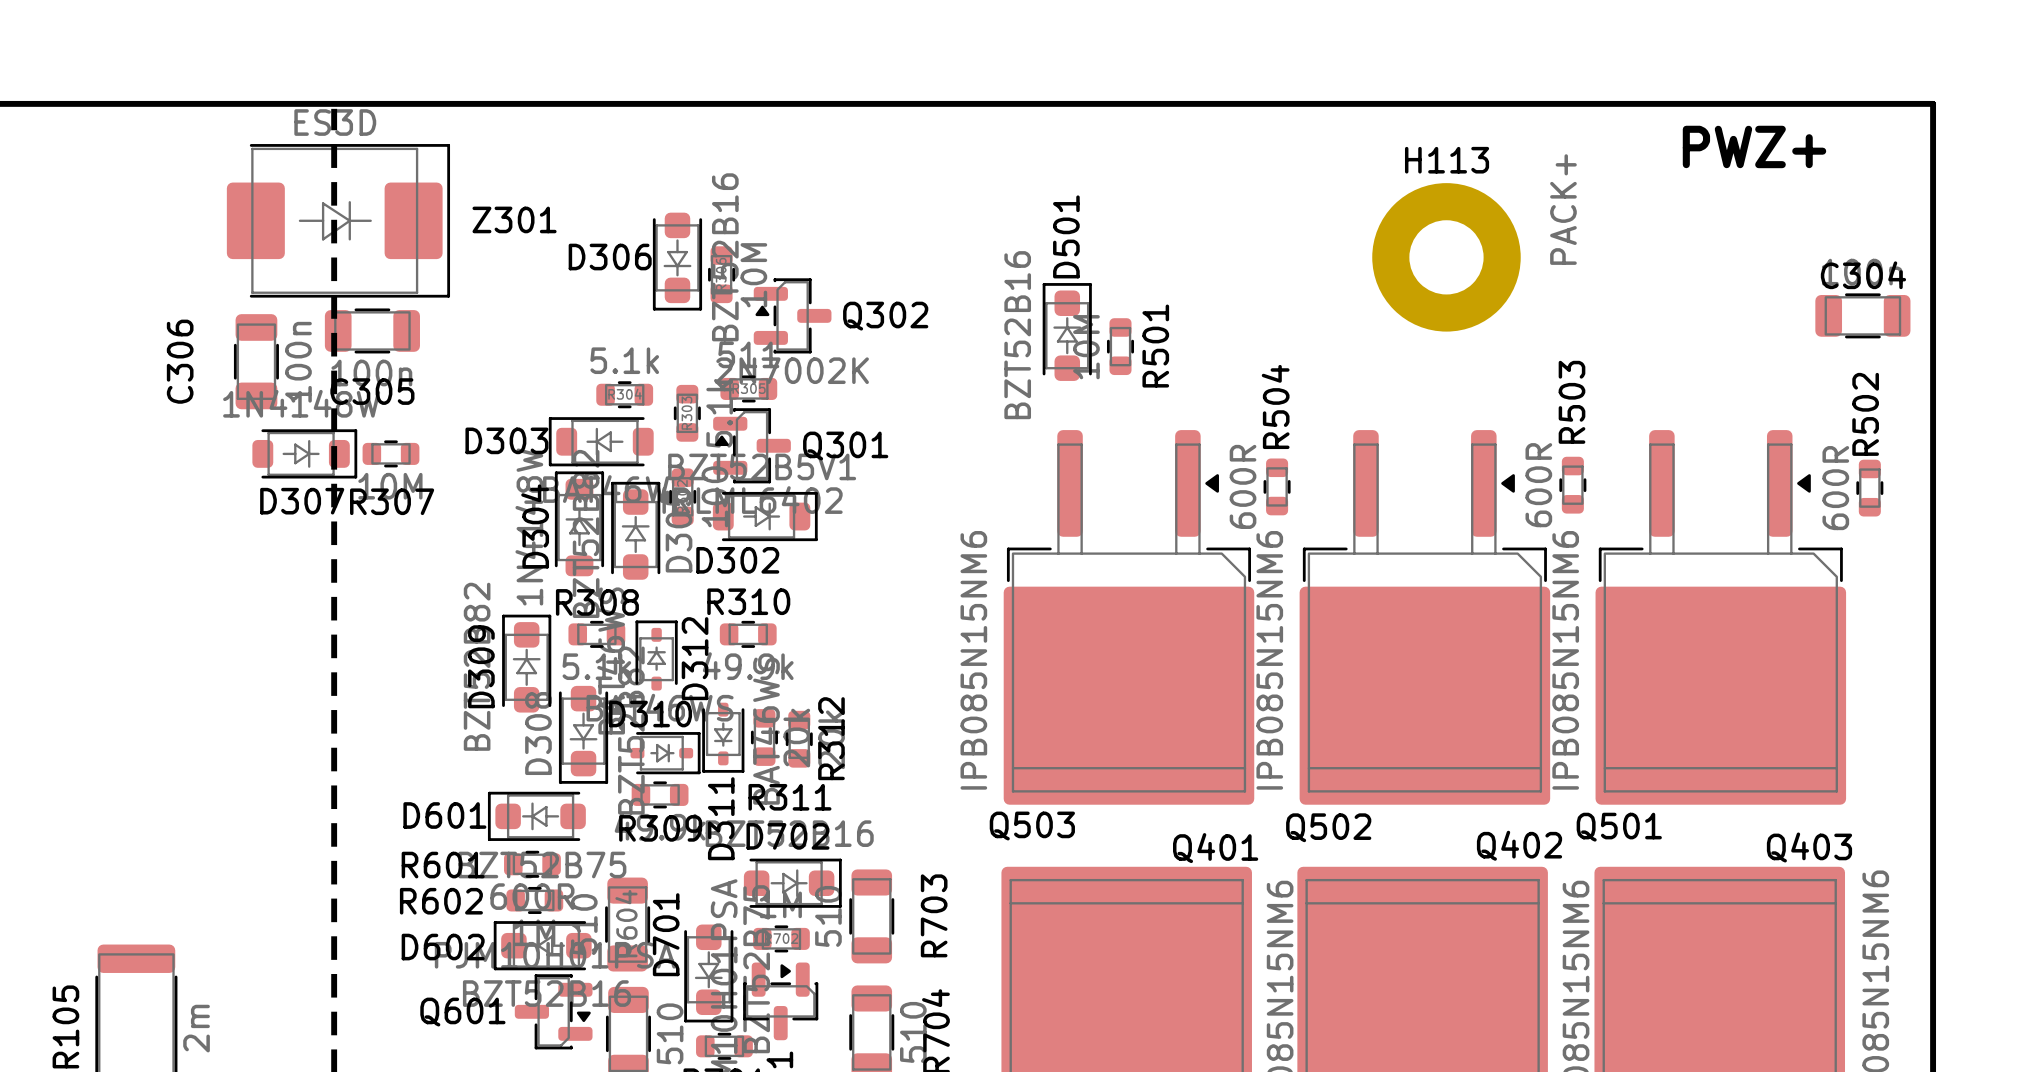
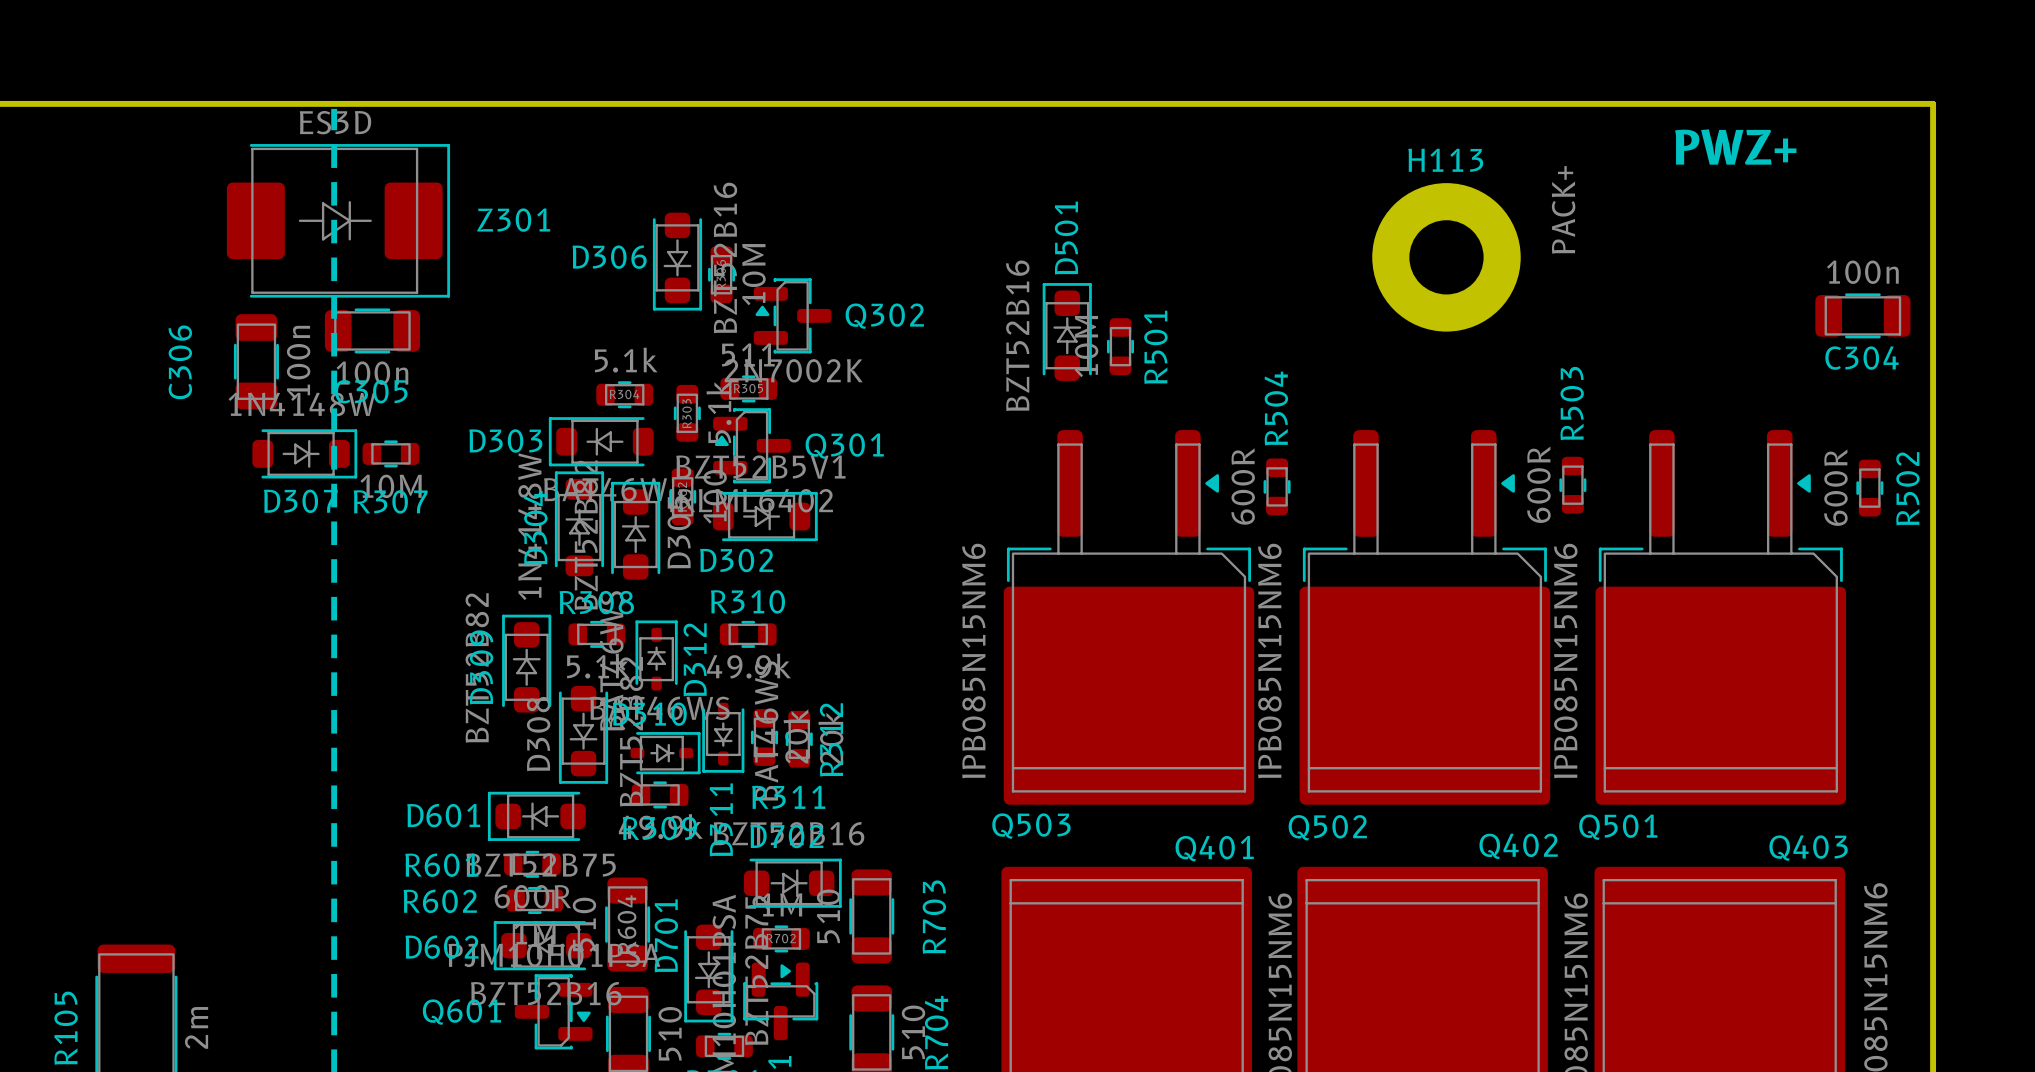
C304 name position: C304 (1863, 275) -> C304 (1862, 358)
R502 name position: R502 (1865, 414) -> R502 (1907, 488)

